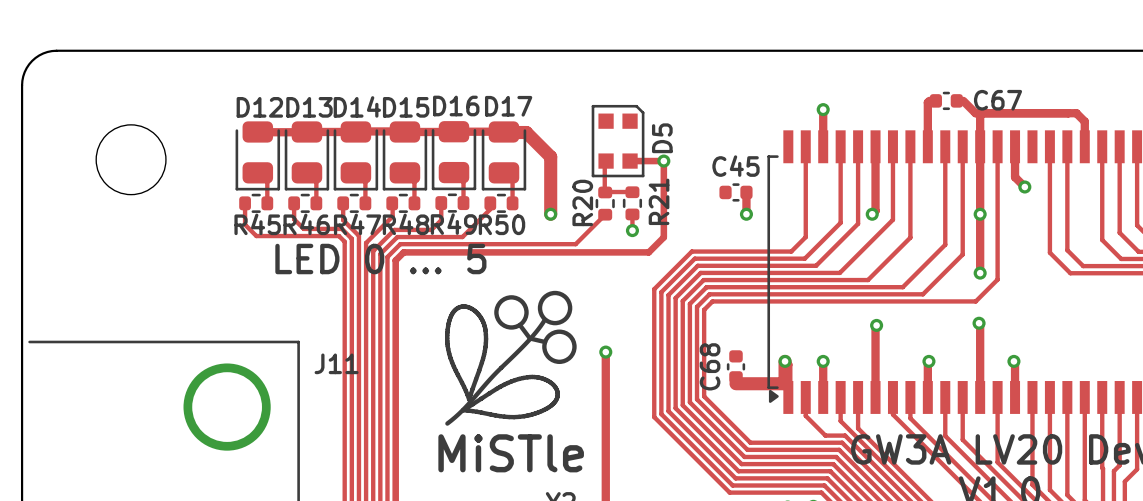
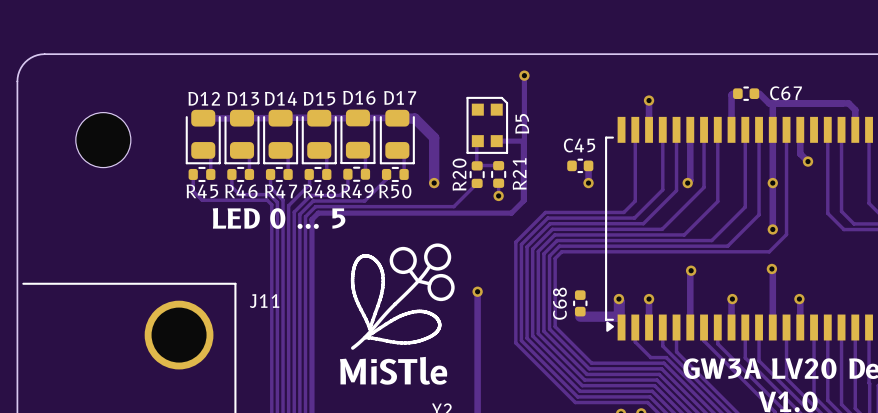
track: none -> (524, 75) (523, 201)
via position: (663, 161) -> (524, 75)

